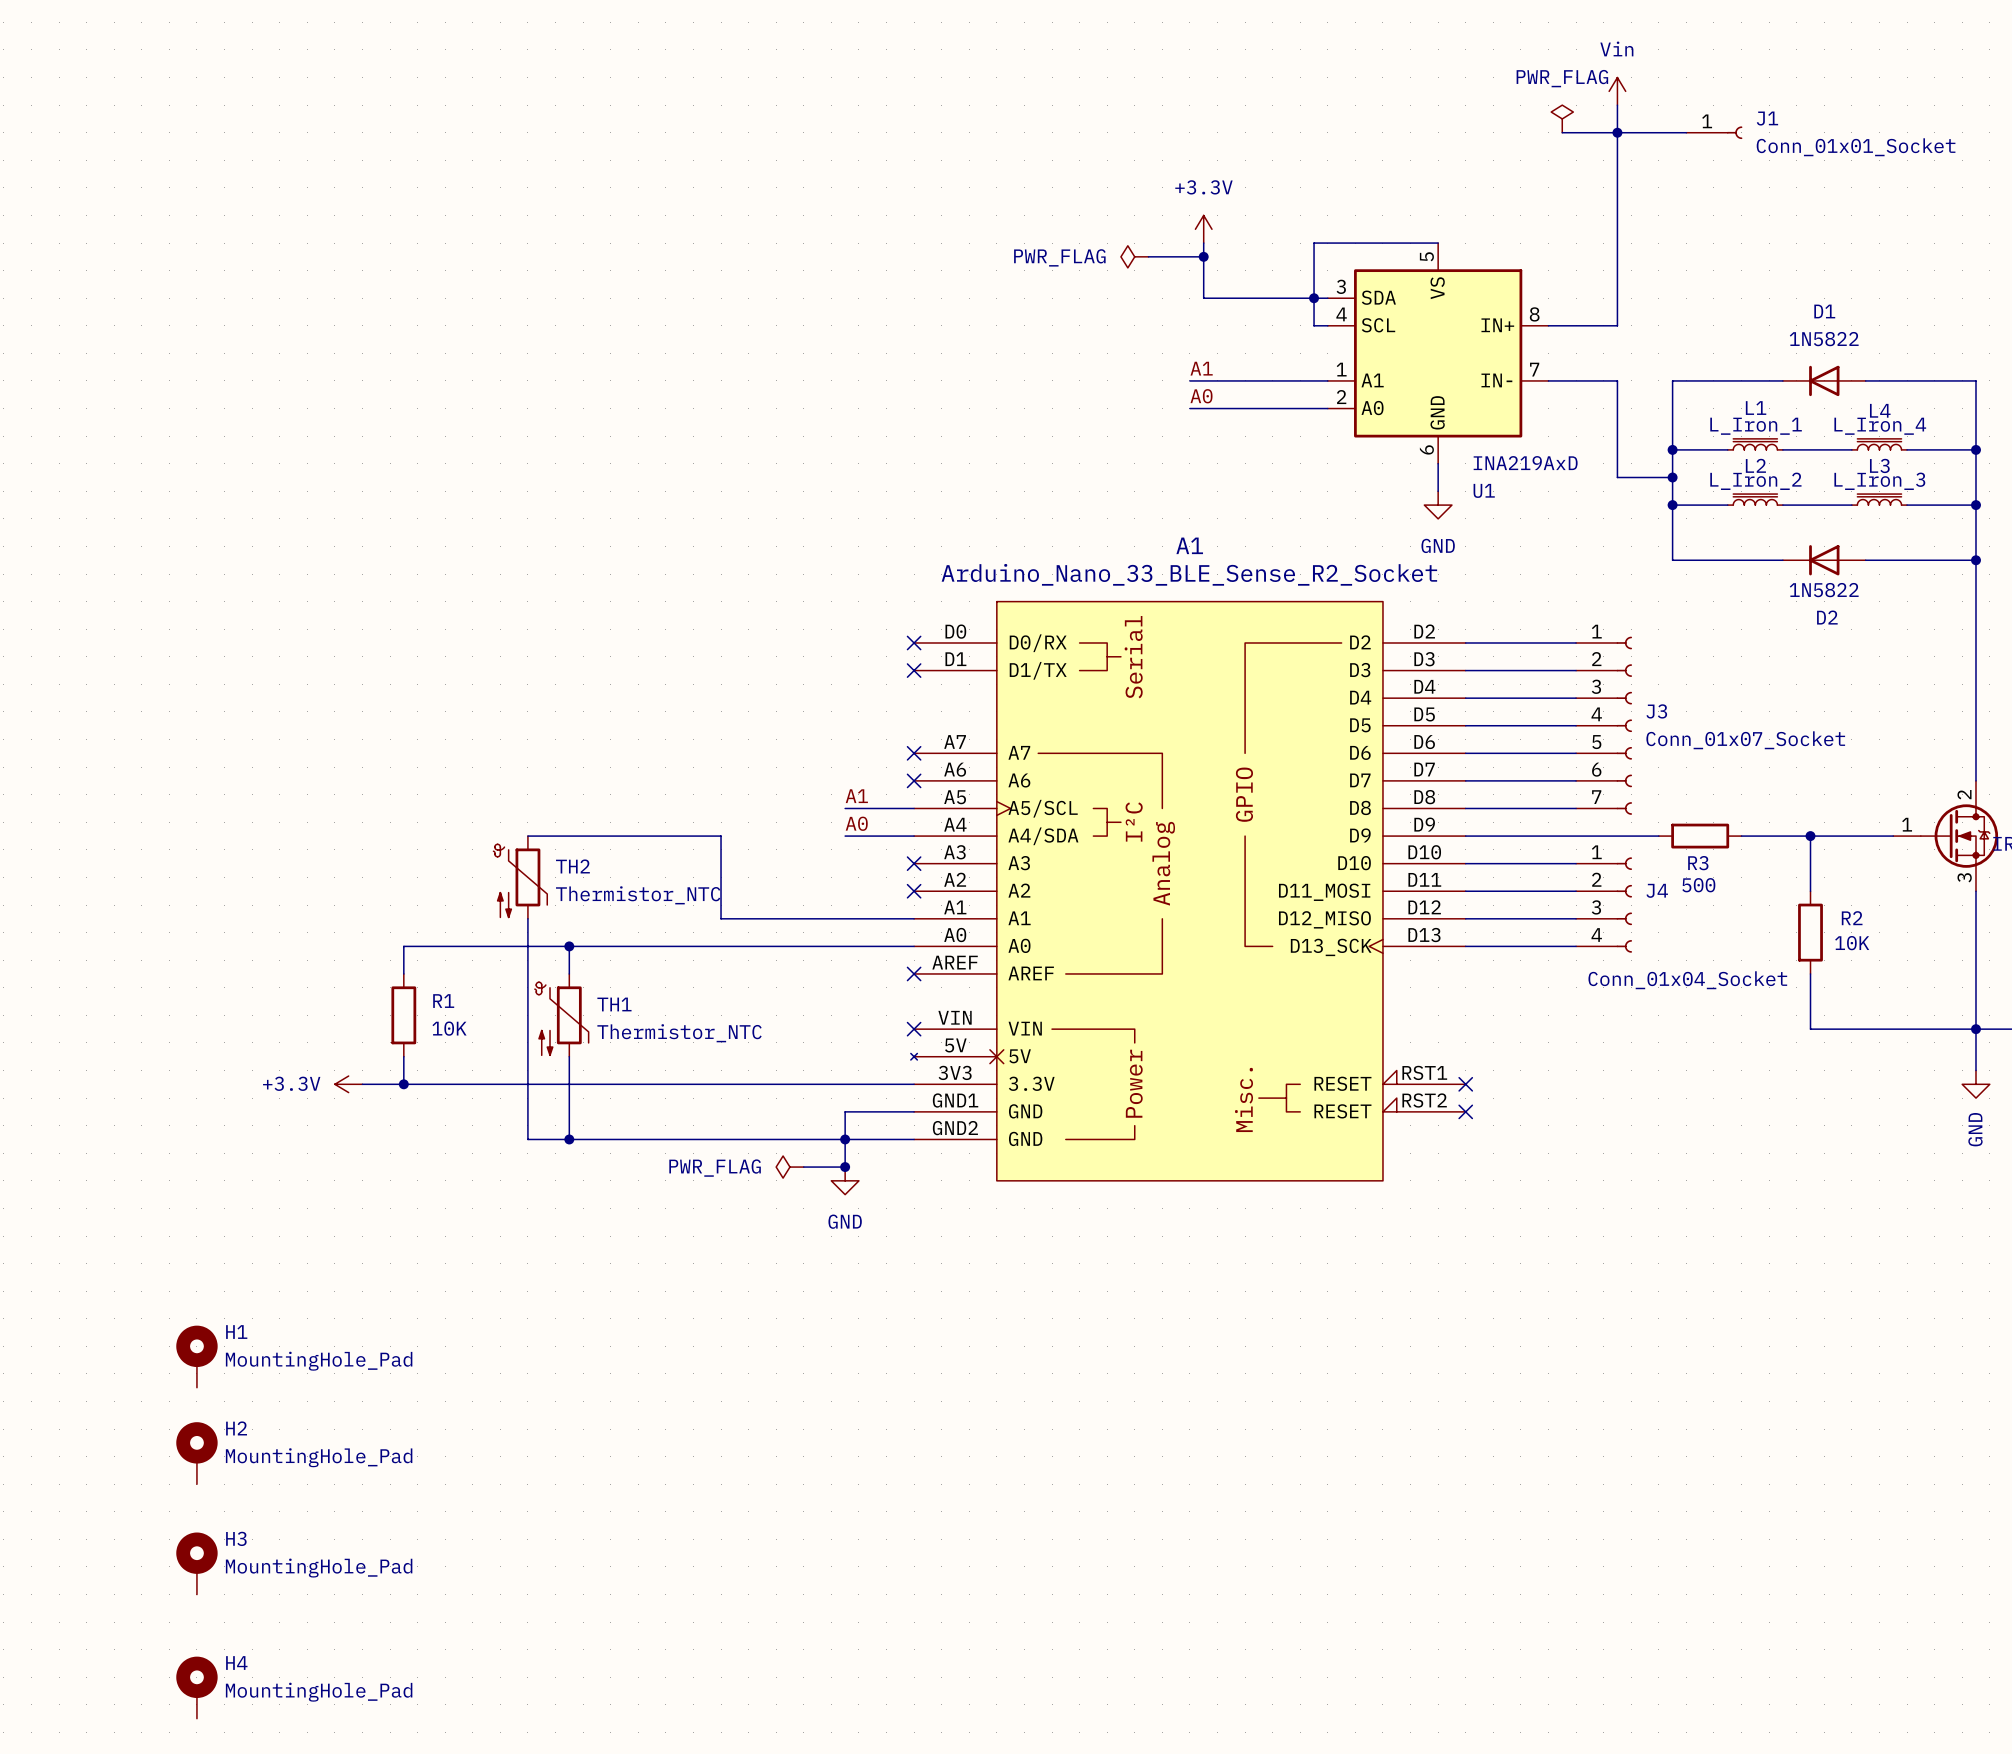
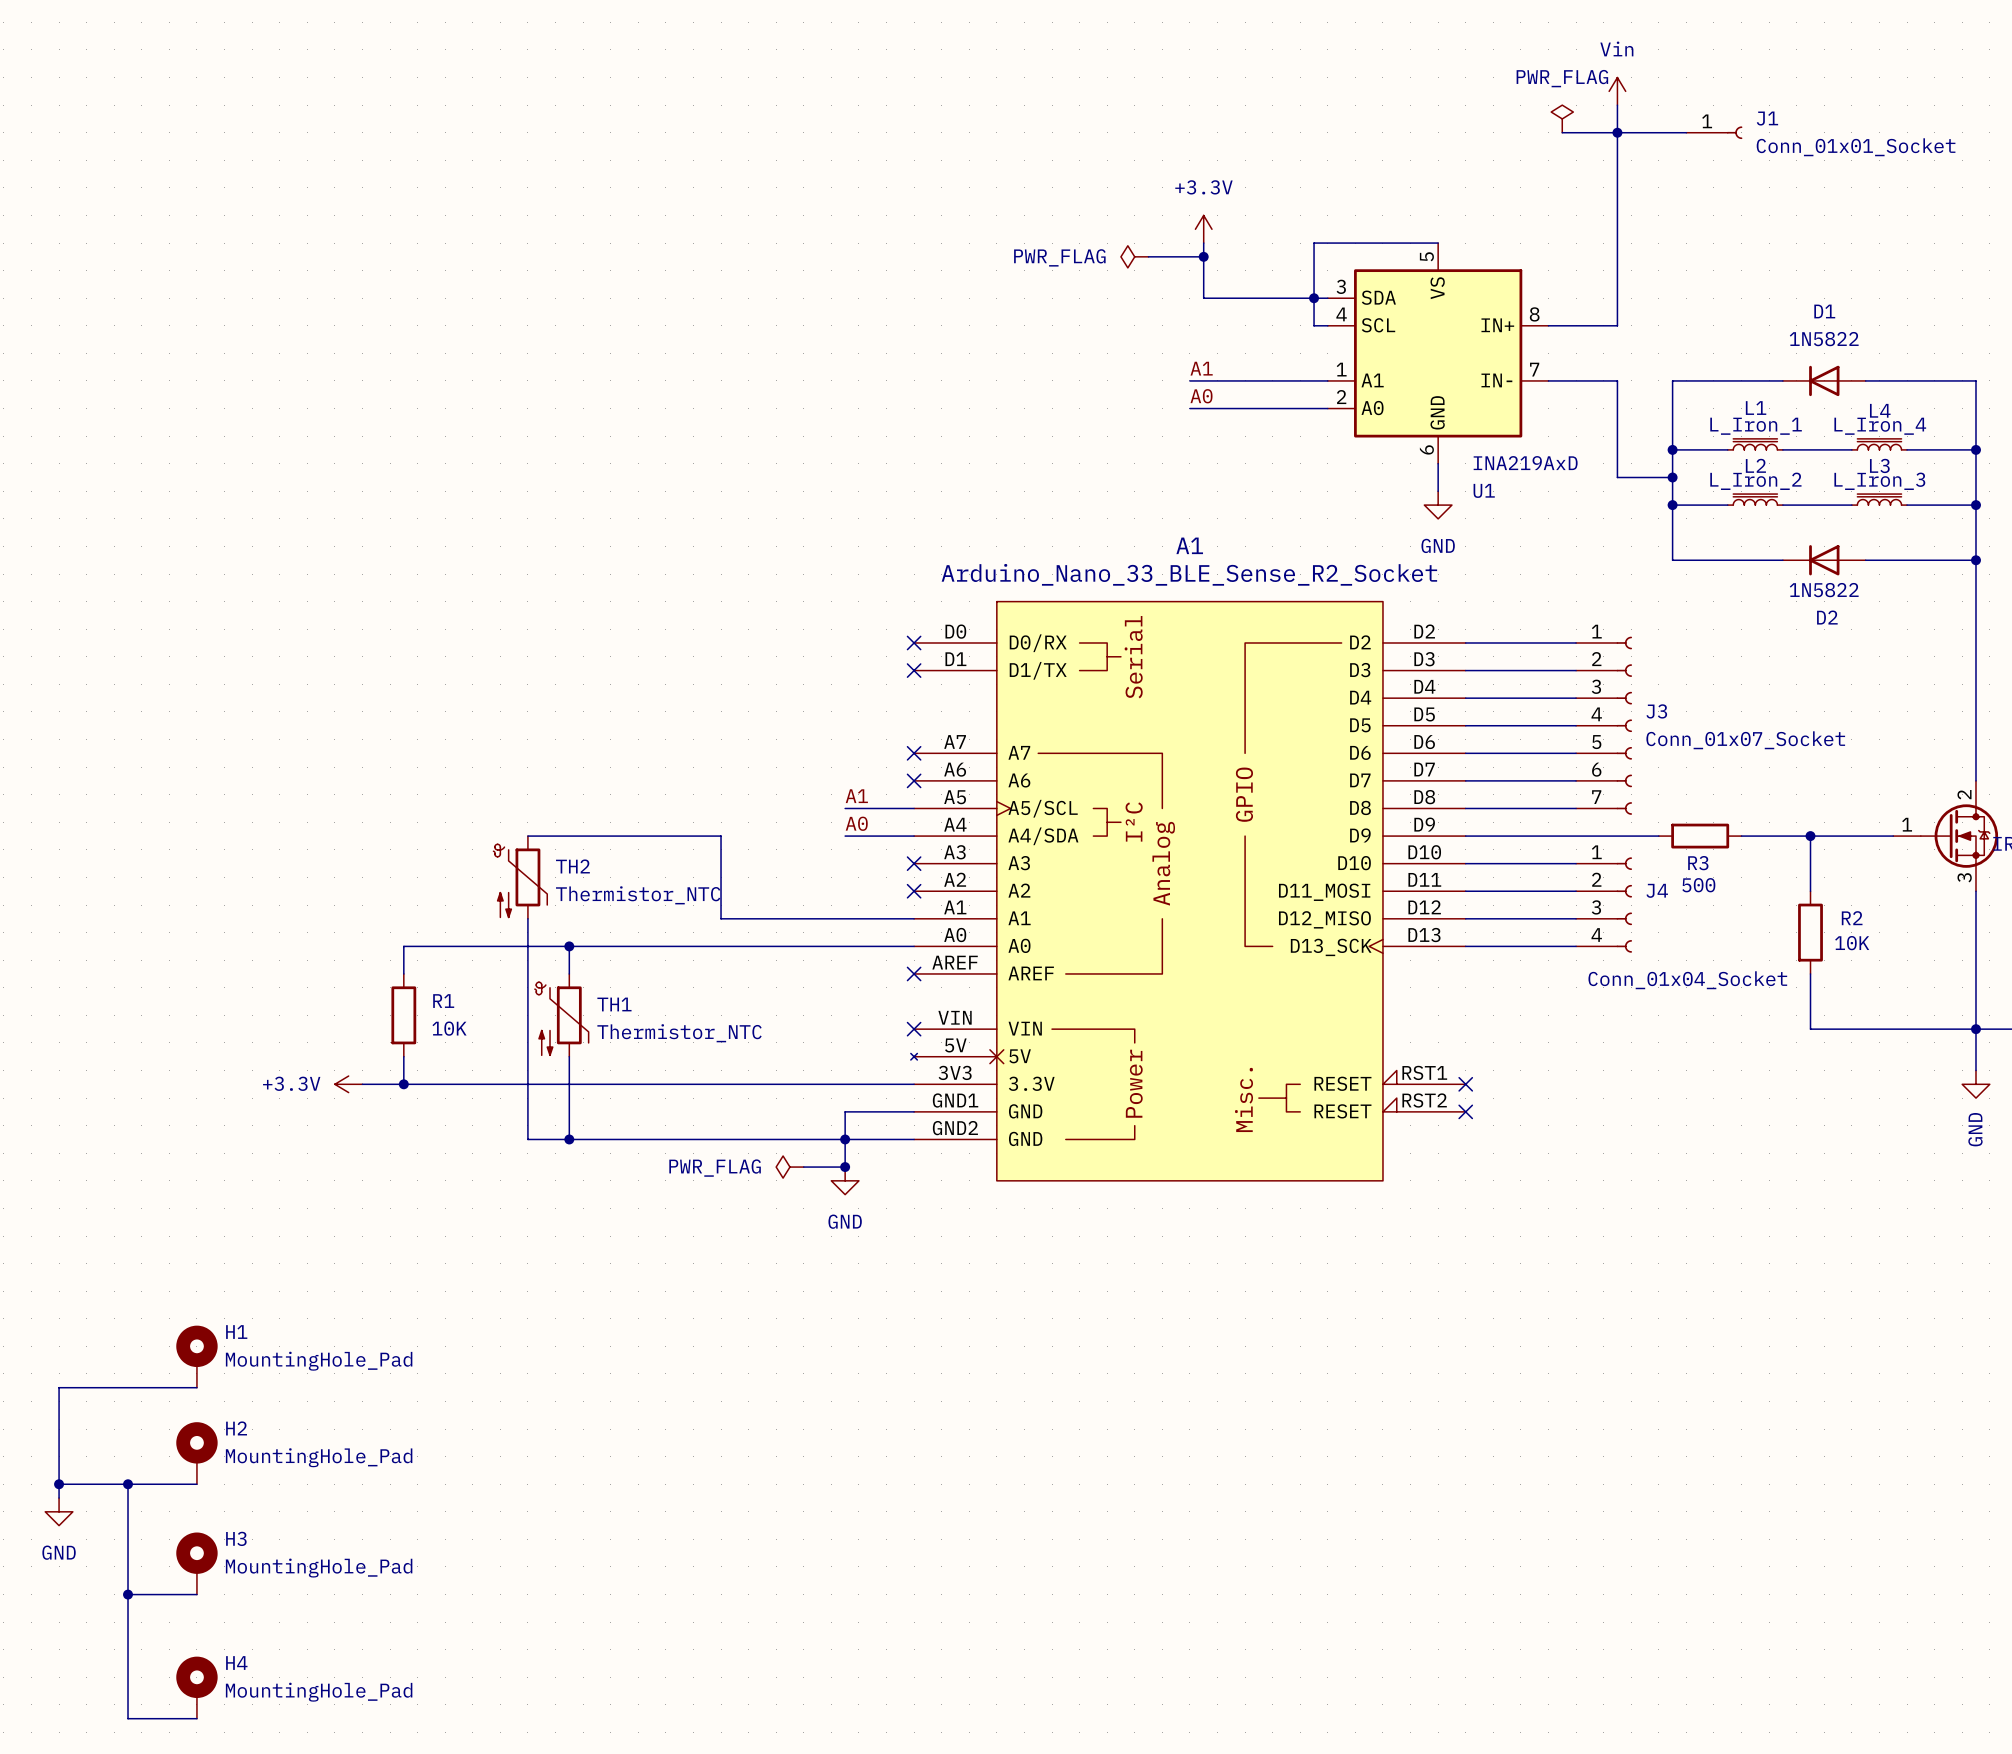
wire: none -> (196, 1387) (59, 1387) (59, 1498)
wire: none -> (59, 1484) (196, 1484)
junction: none -> (59, 1484)
wire: none -> (128, 1484) (128, 1718) (196, 1718)
junction: none -> (128, 1484)
power symbol: none -> GND (59, 1511)
wire: none -> (128, 1594) (196, 1594)
junction: none -> (128, 1594)

